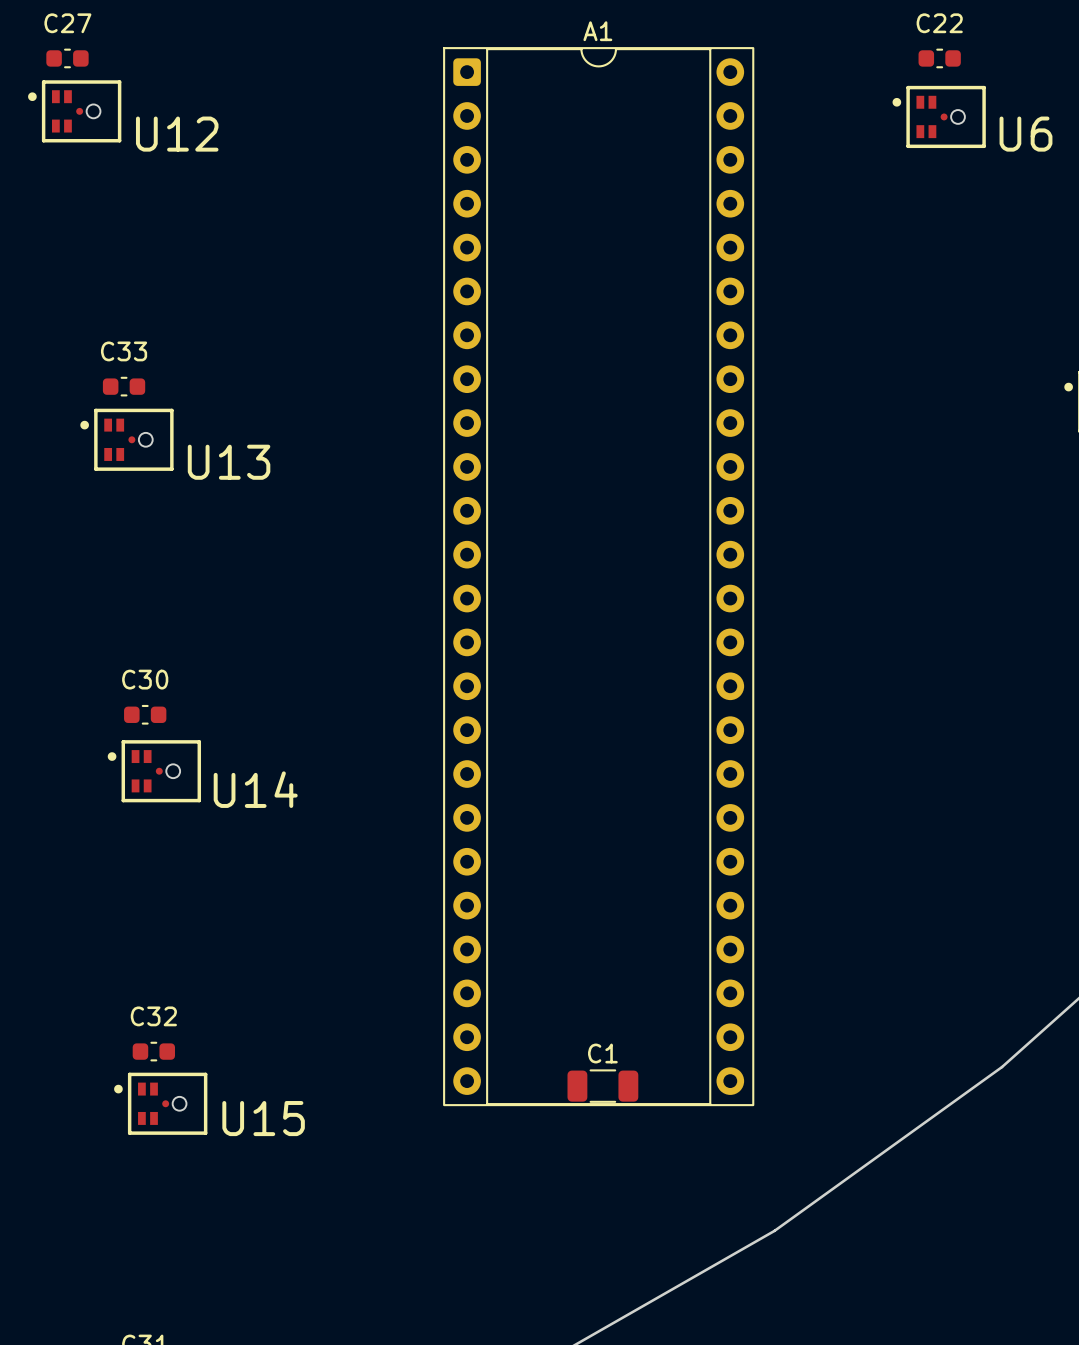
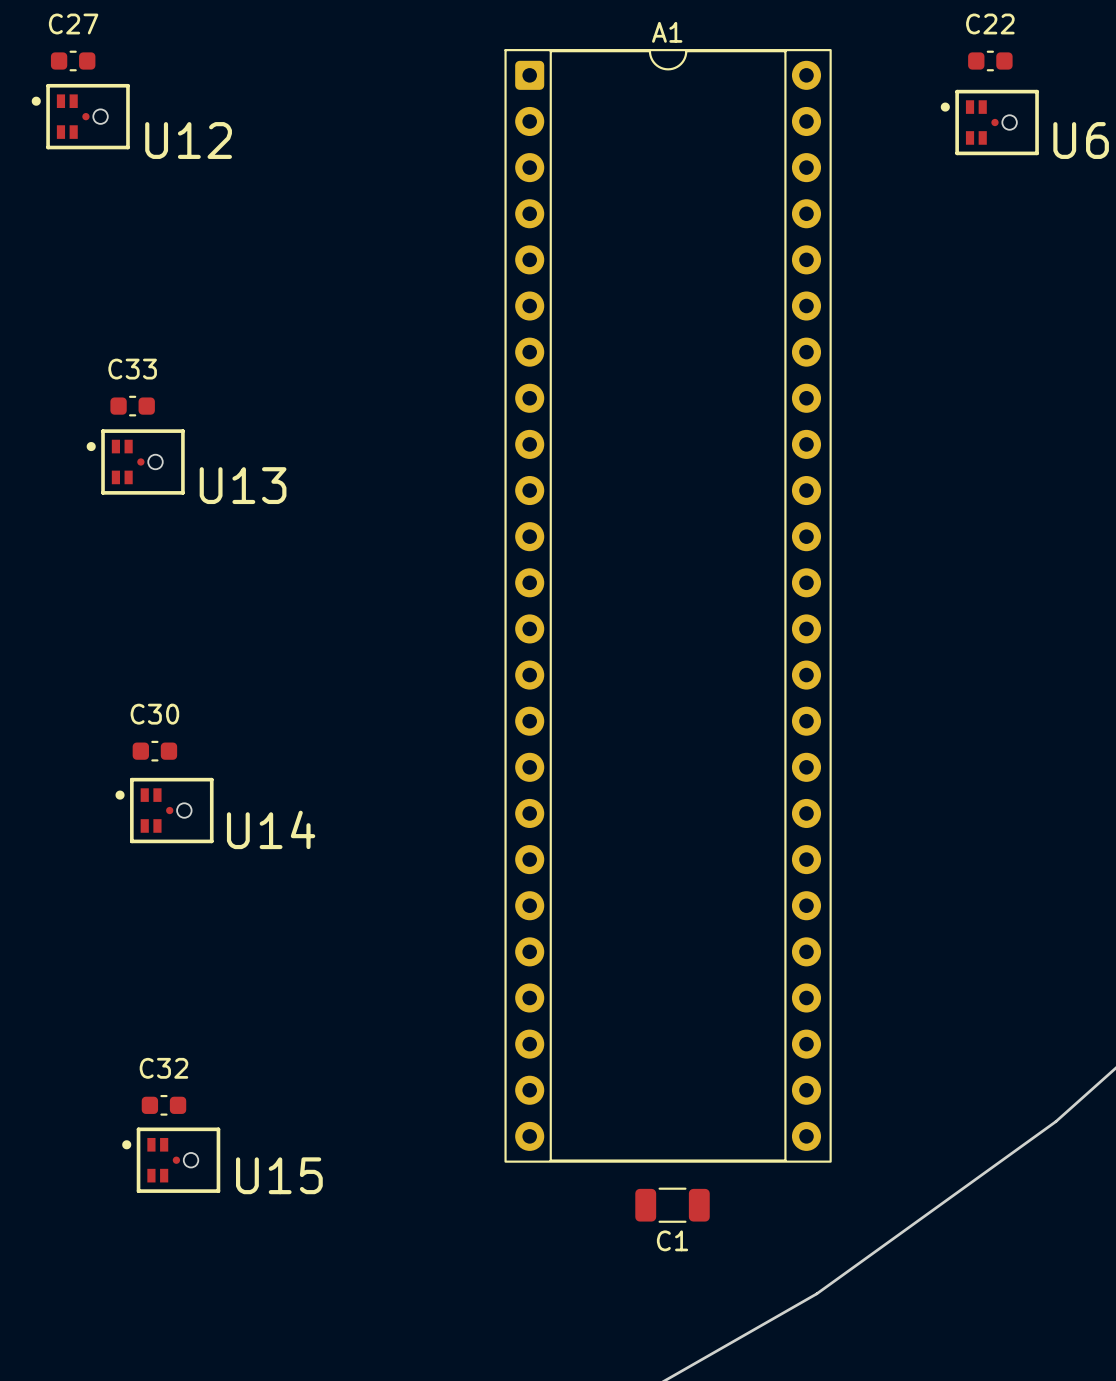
A1 position: (598, 576) -> (668, 605)
C1 name position: C1 (602, 1053) -> C1 (672, 1240)
C1 position: (602, 1086) -> (672, 1205)

